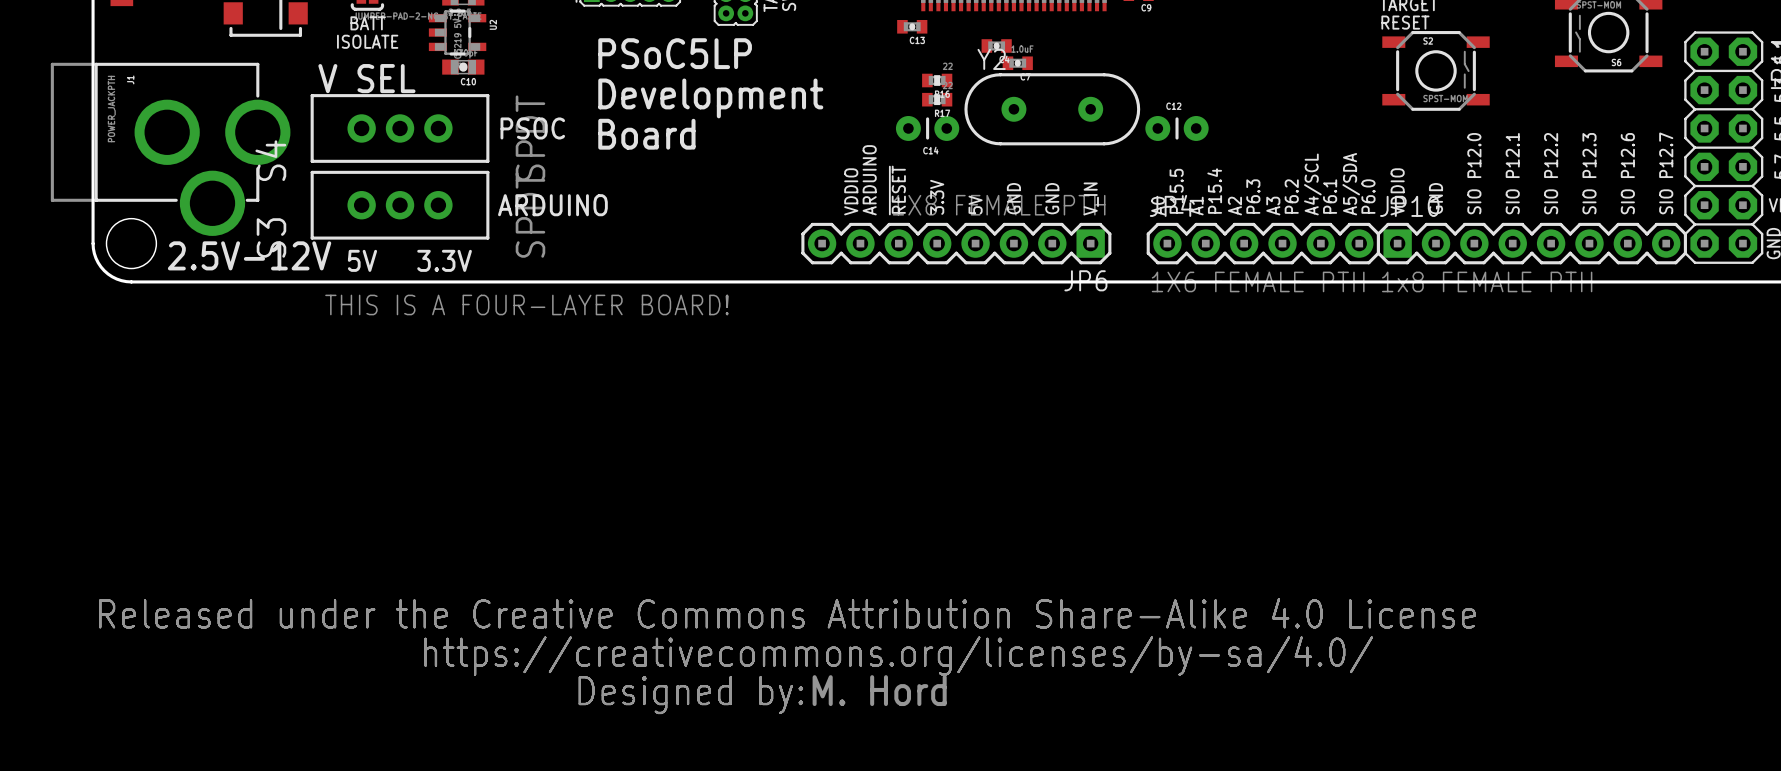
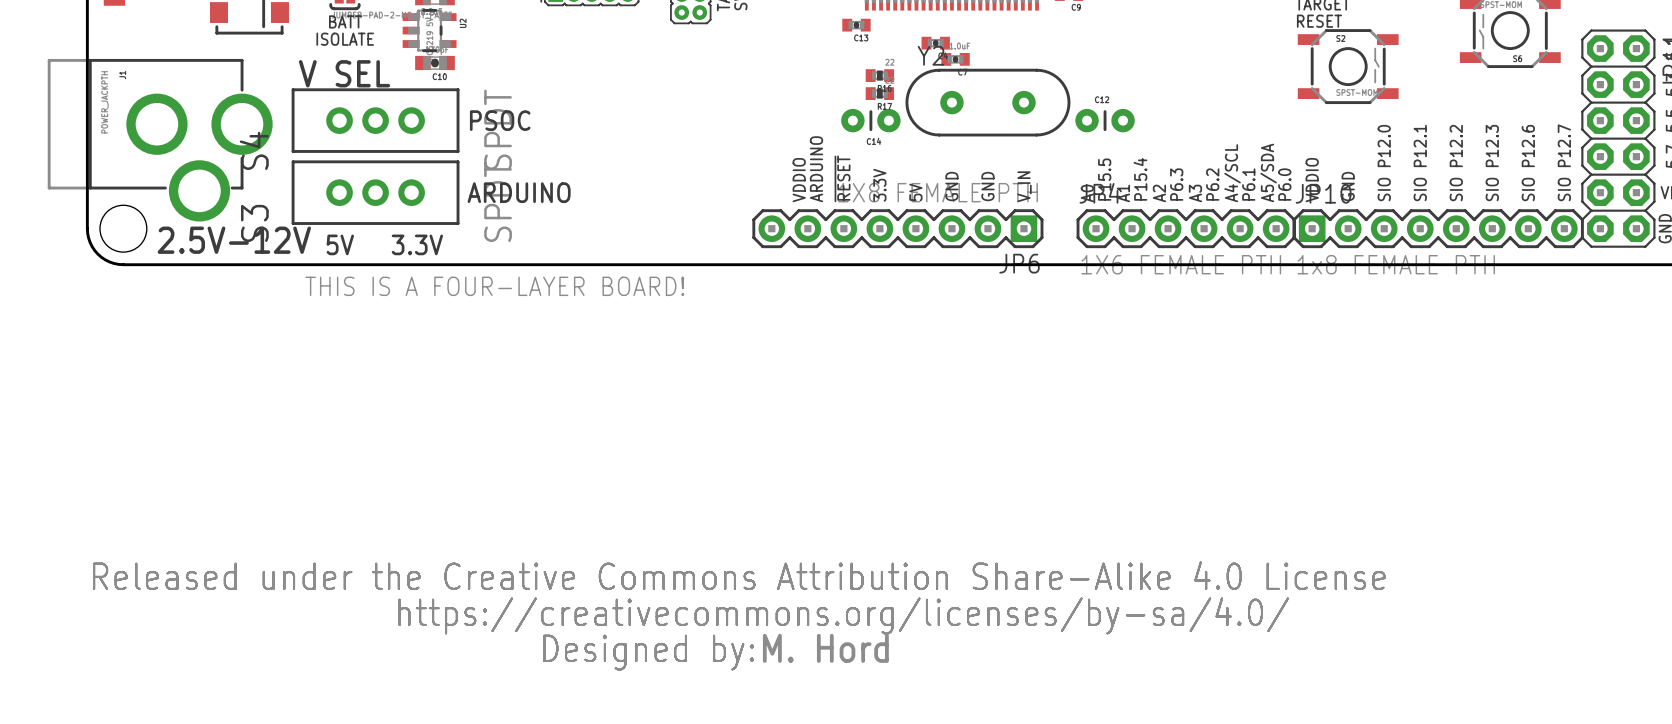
text: PSoC5LP (675, 53) -> none
text: Development (710, 98) -> none
text: Board (646, 134) -> none

